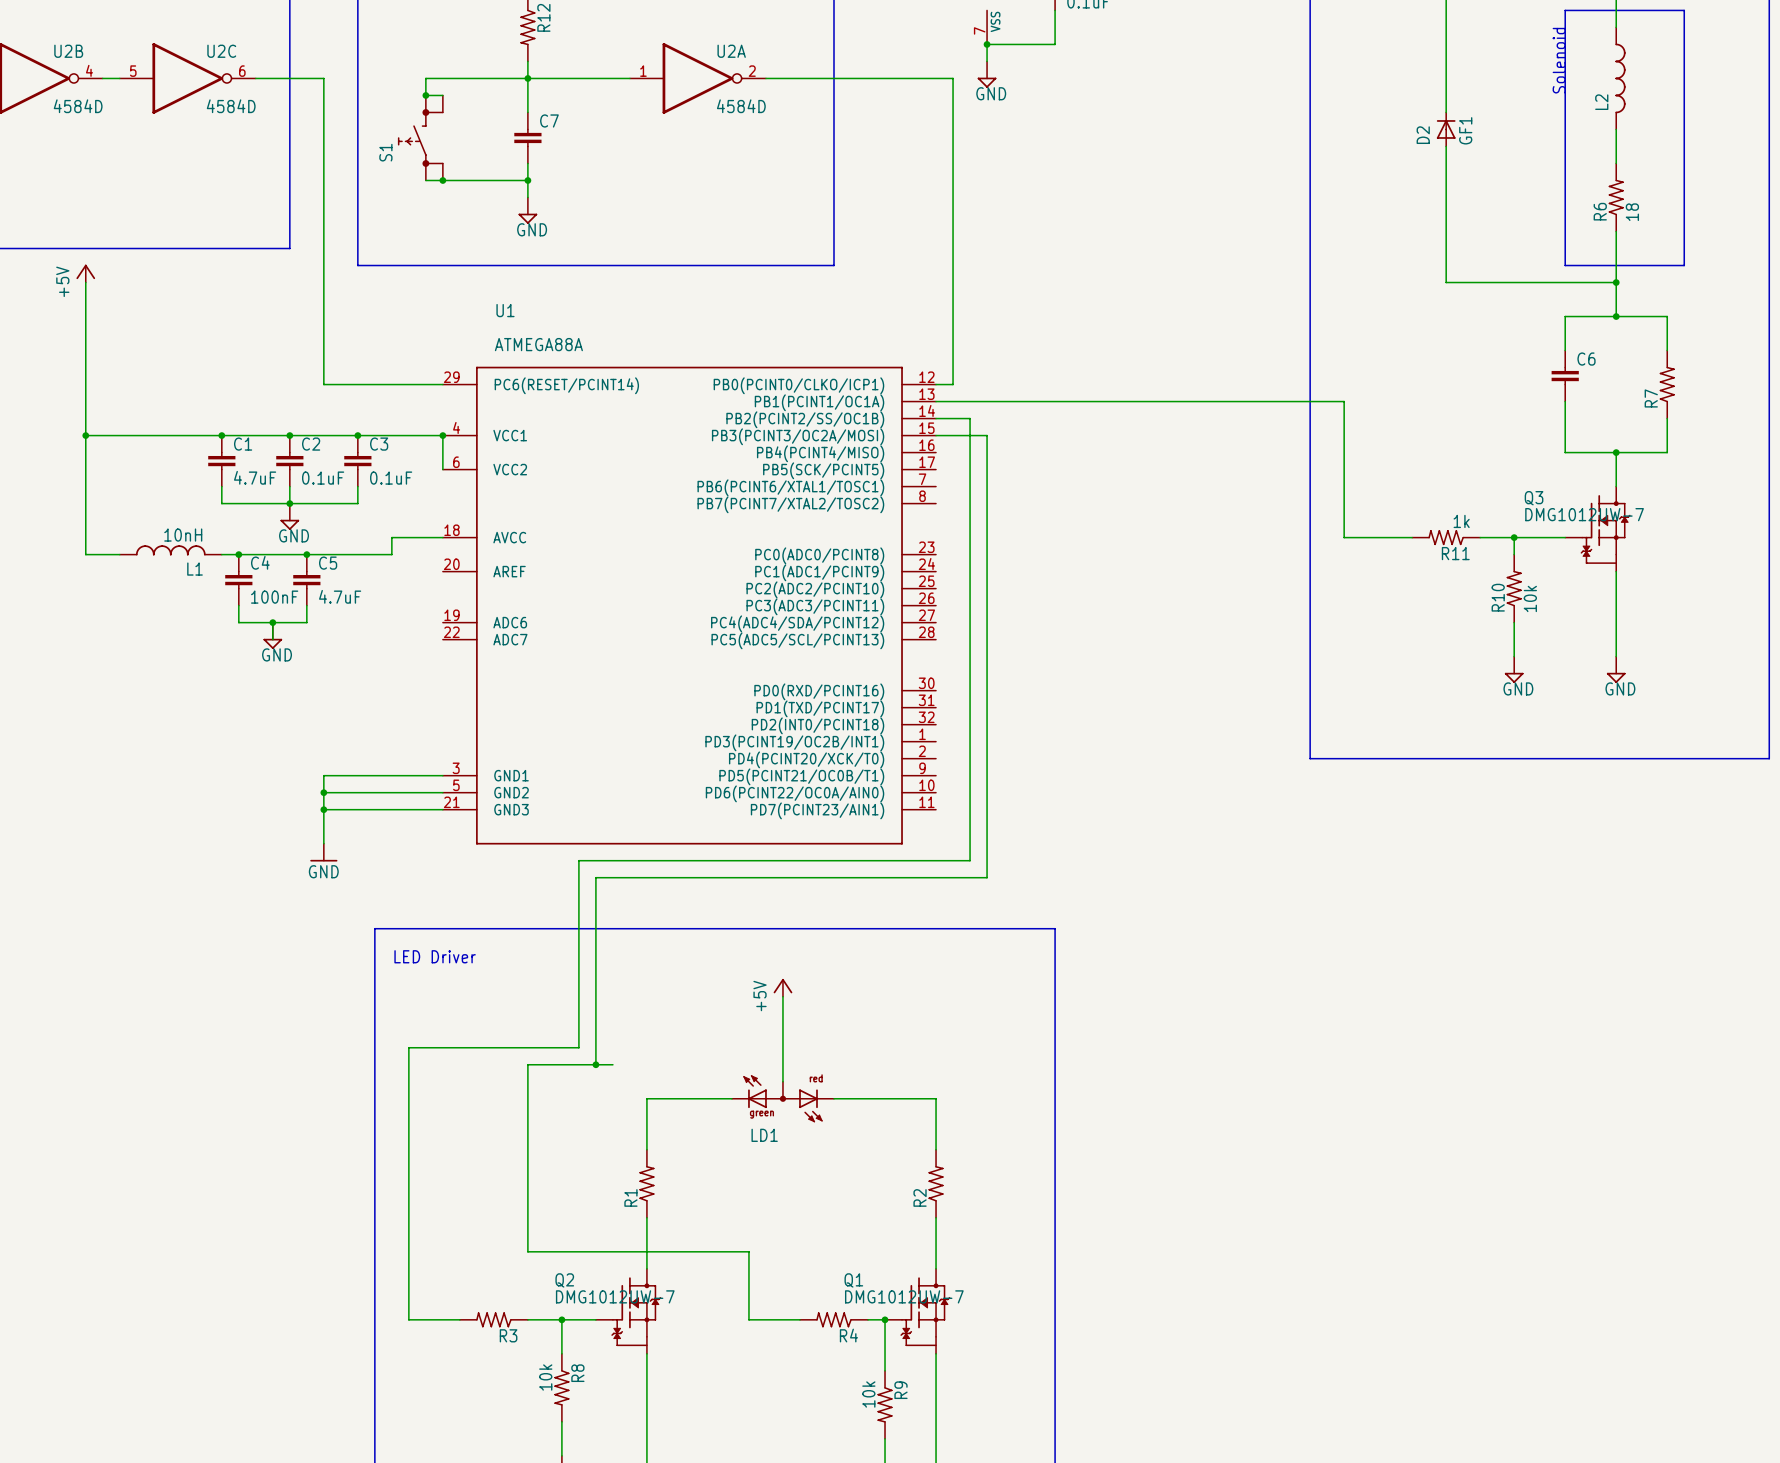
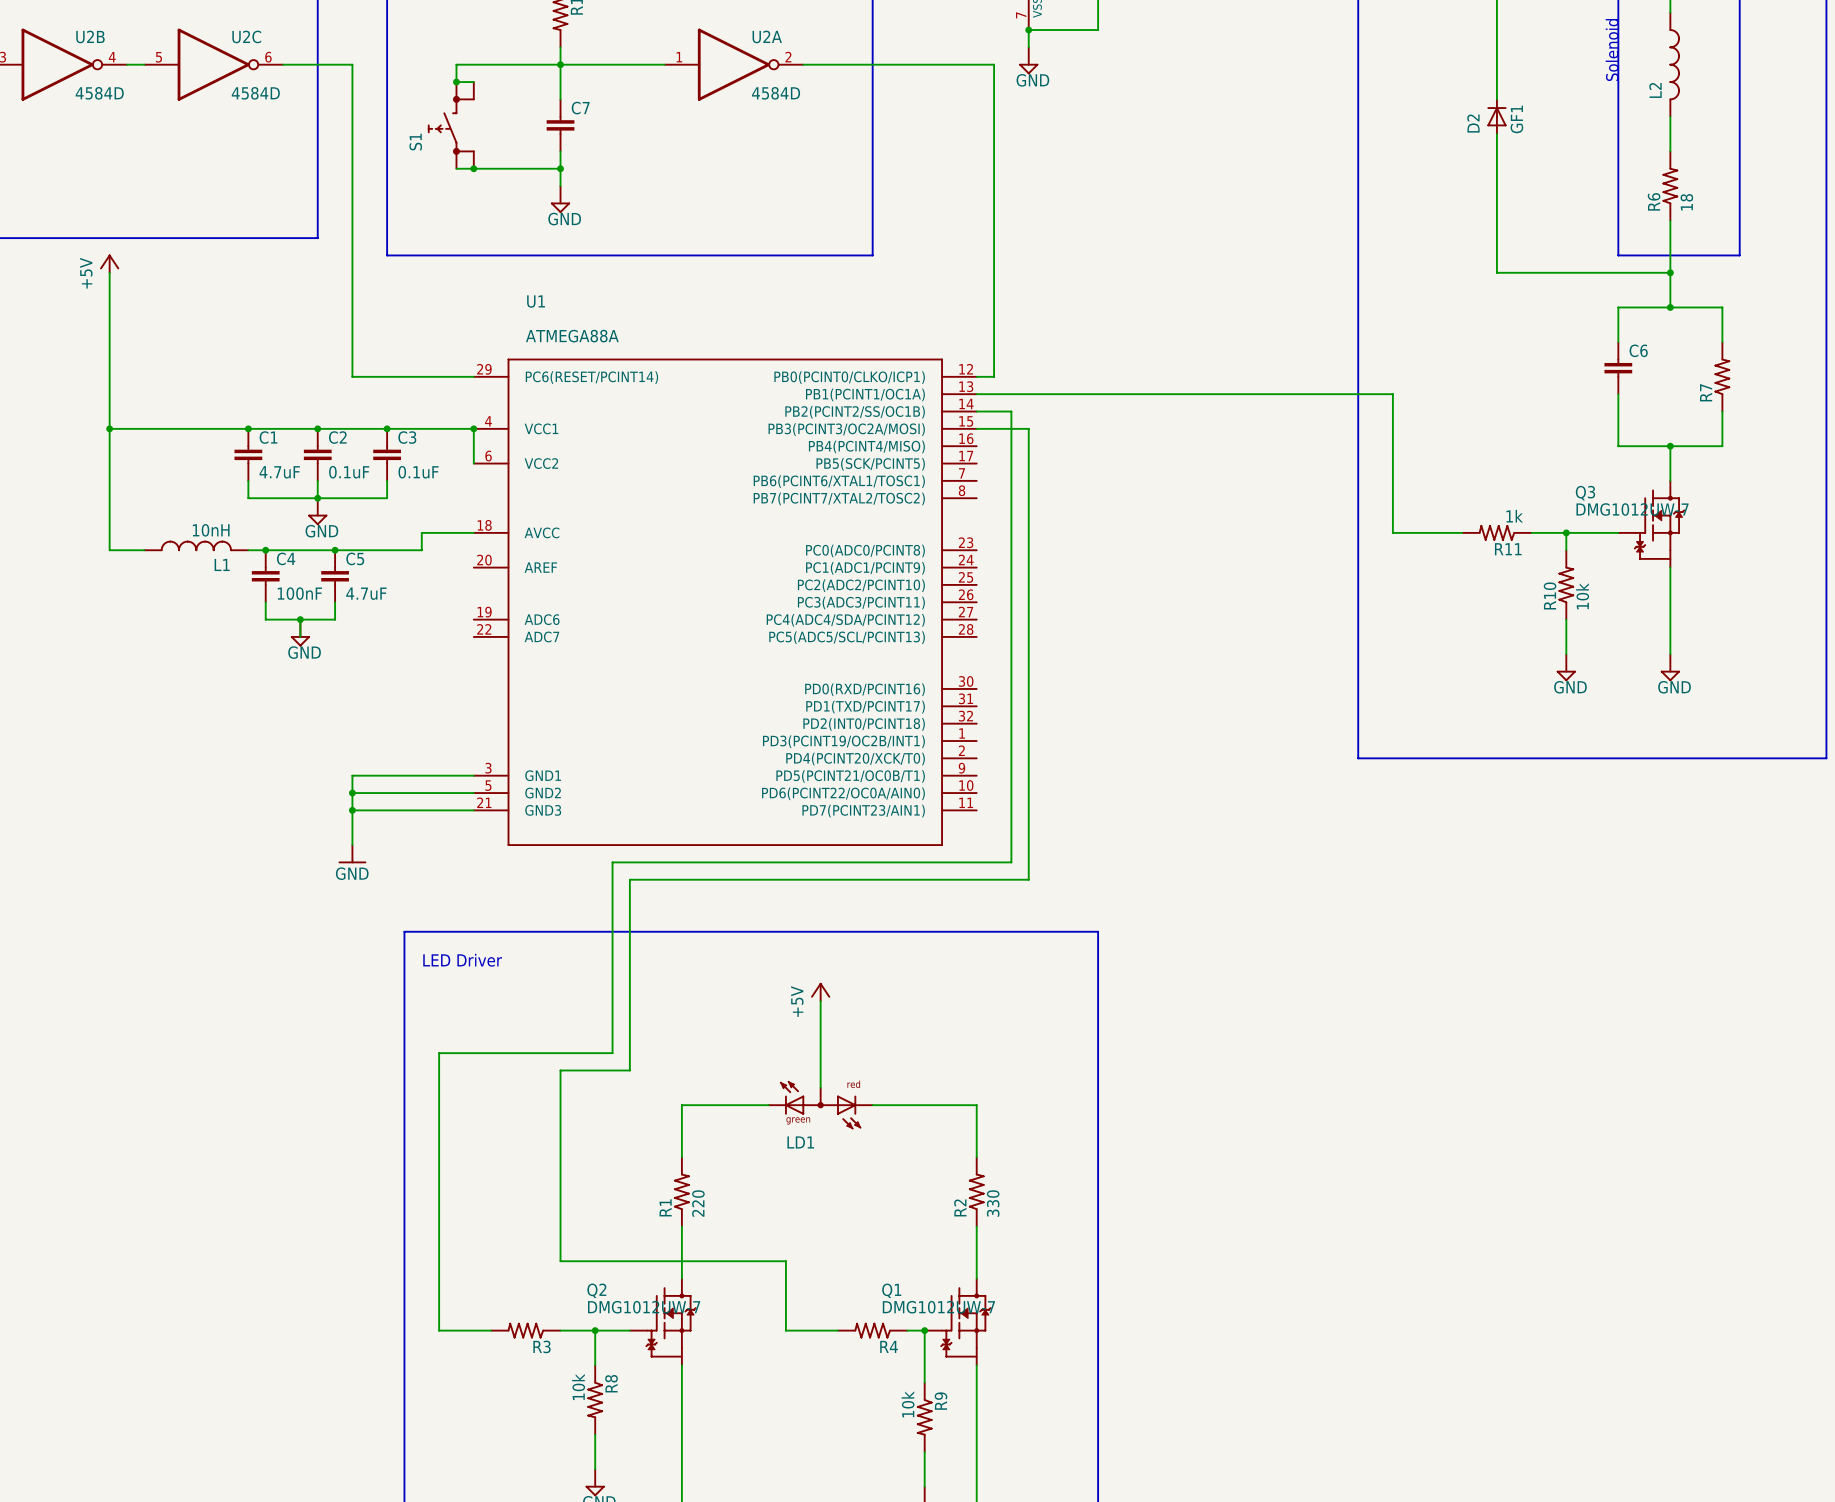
wire: (595, 1064) (612, 1064) -> none
junction: (595, 1064) -> none
R1 value: none -> 220 (698, 1203)
R2 value: none -> 330 (993, 1203)

